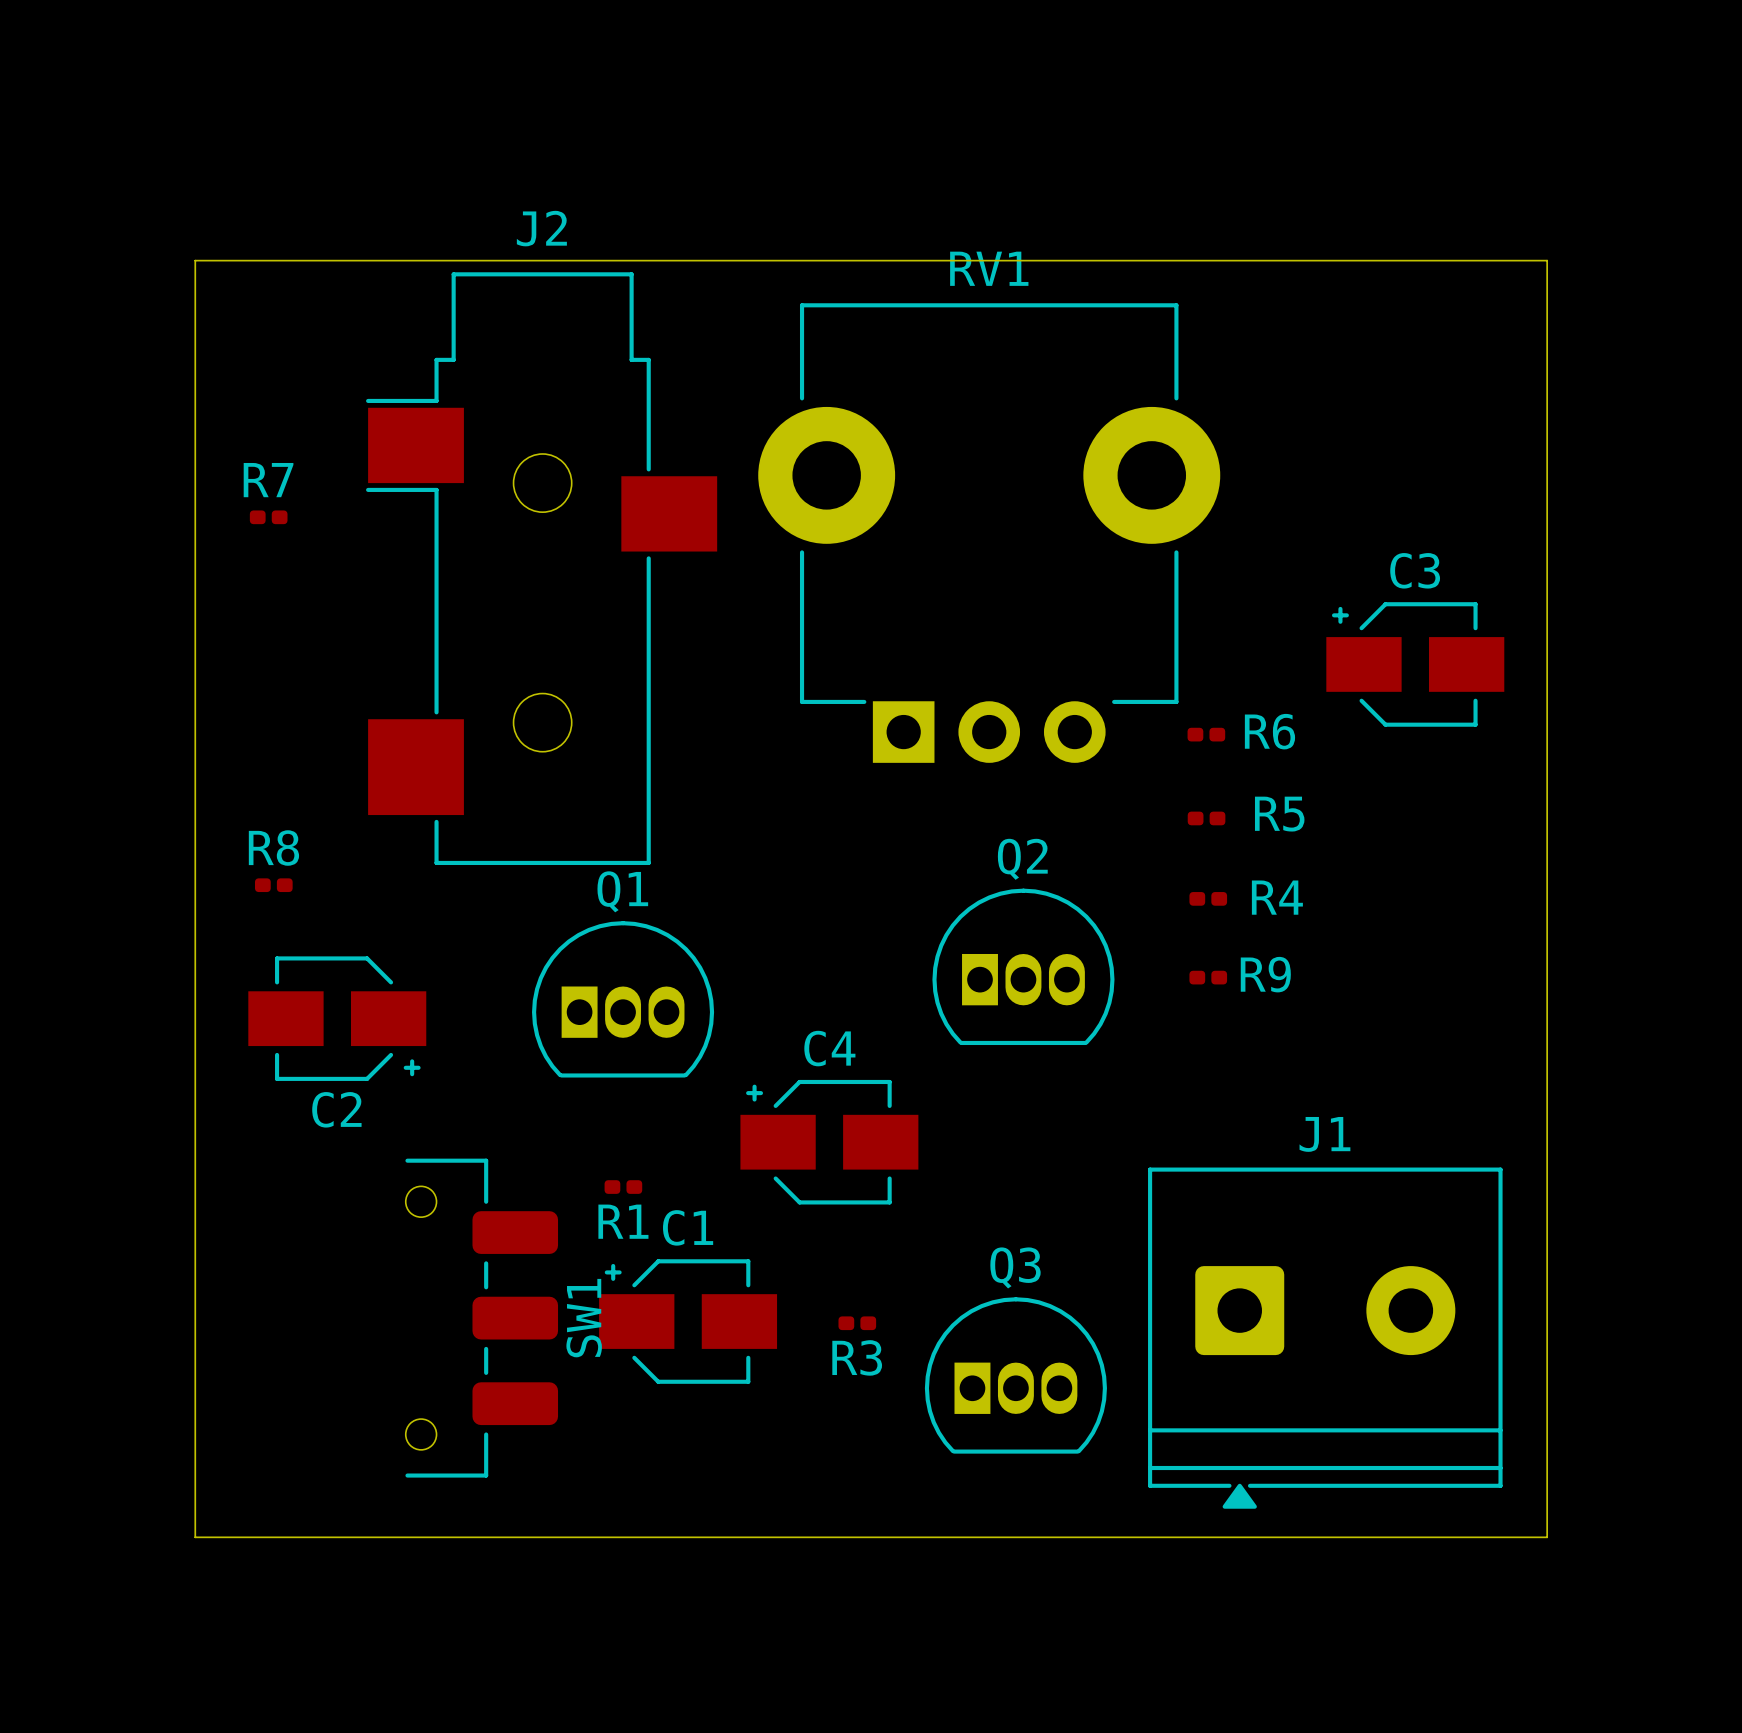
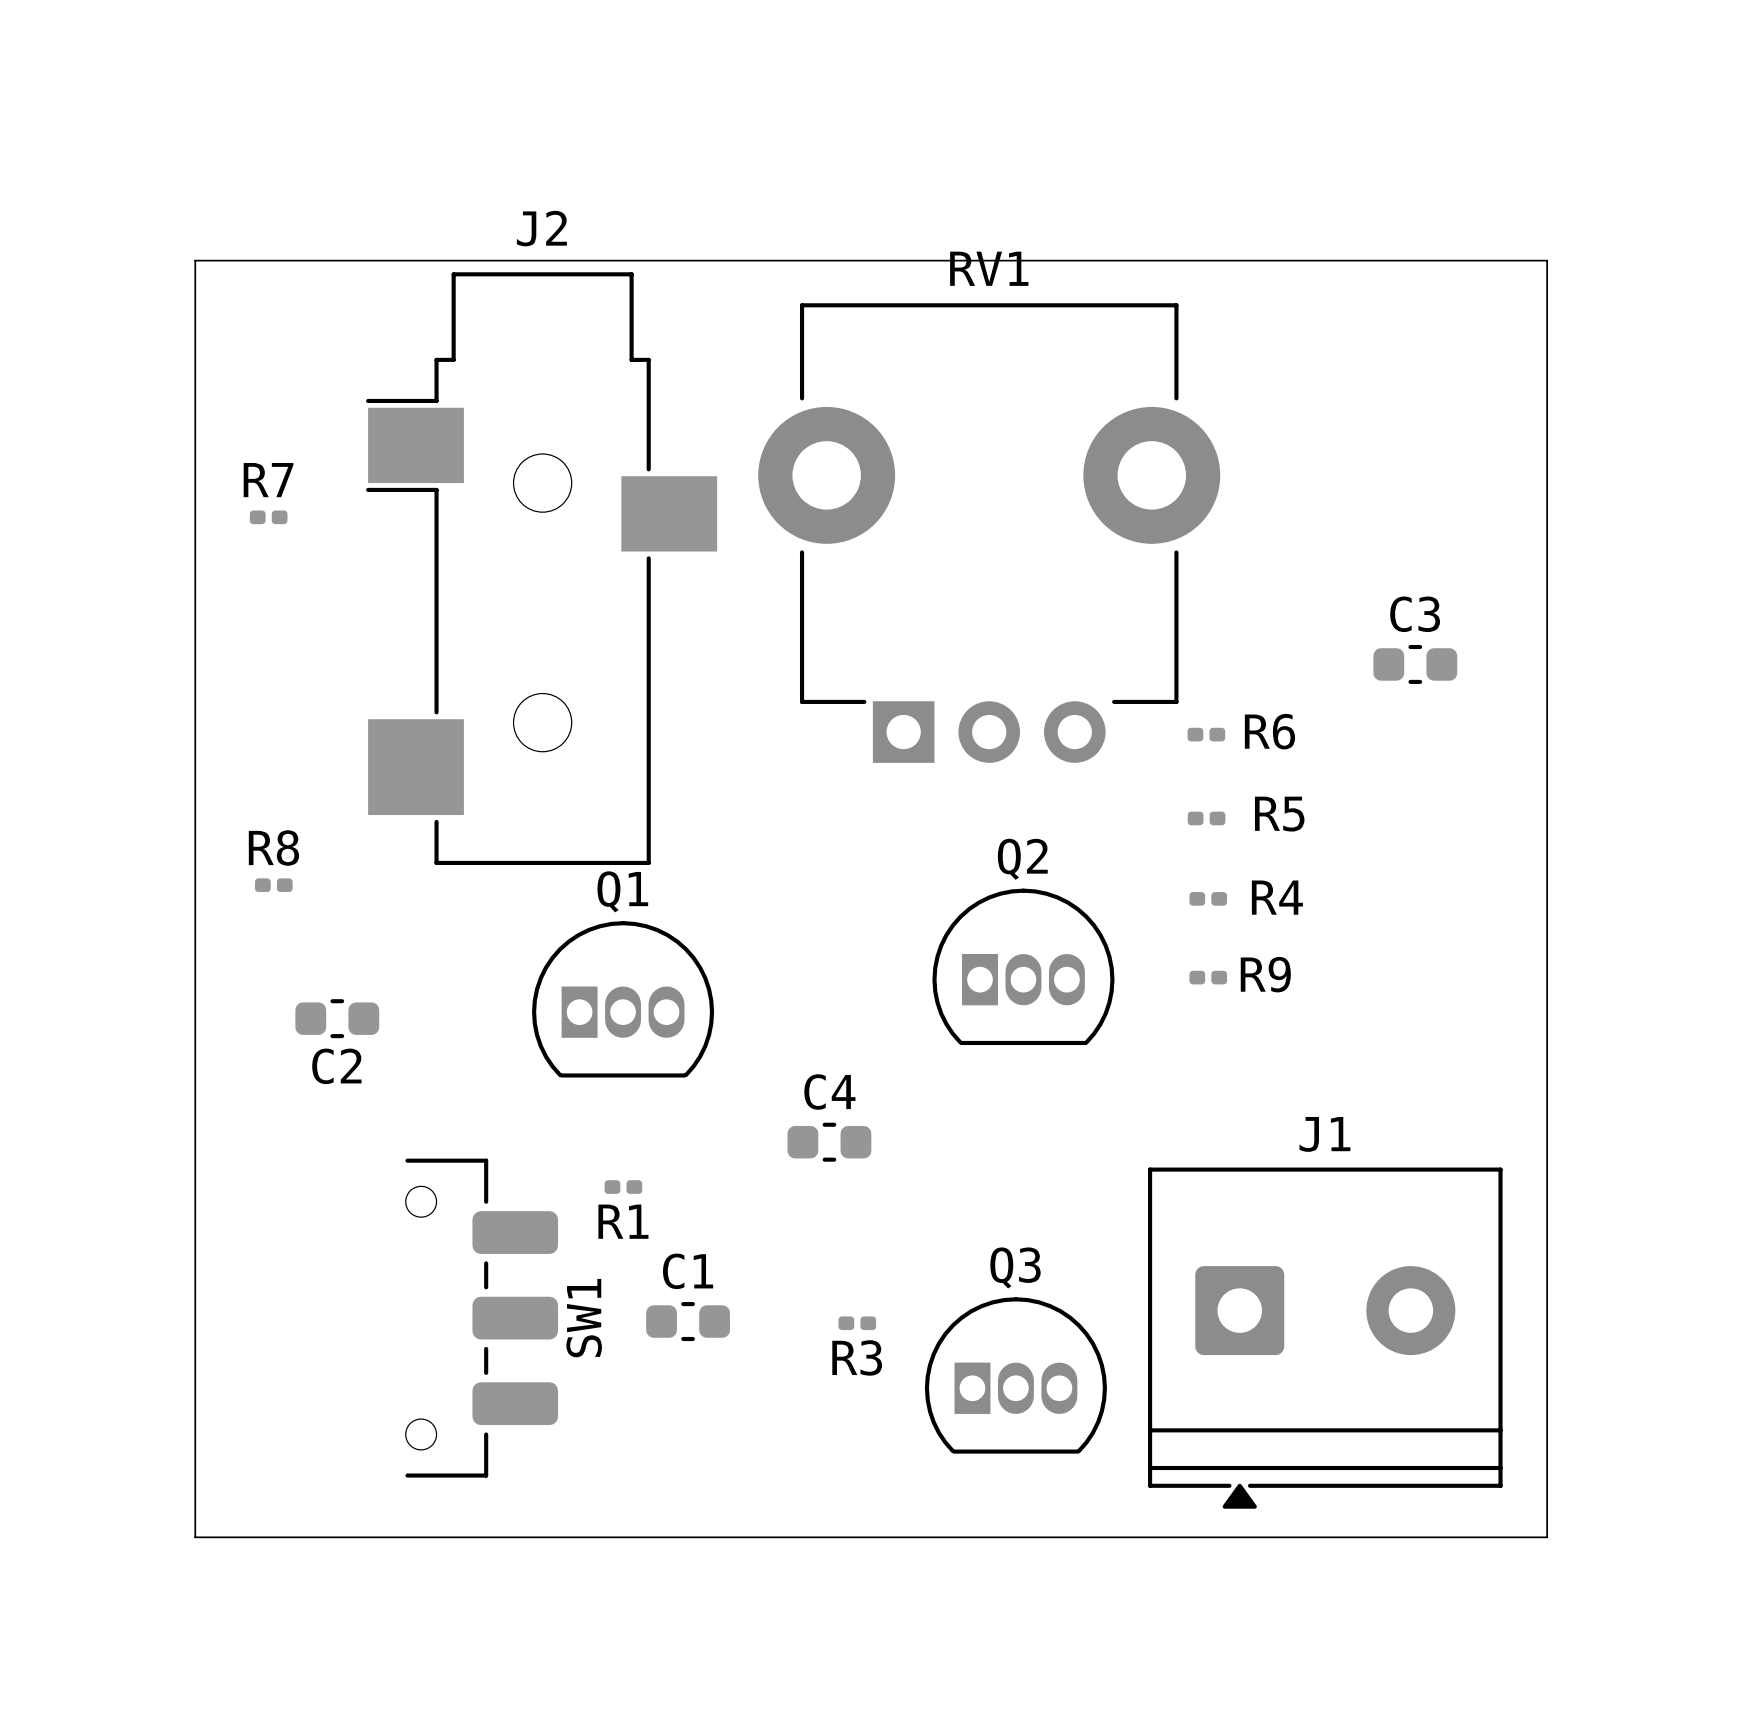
C3 footprint: [1326, 602, 1505, 727] -> [1373, 644, 1458, 684]
C2 footprint: [248, 956, 427, 1081] -> [295, 999, 380, 1039]
C4 footprint: [740, 1079, 919, 1205] -> [787, 1122, 872, 1162]
C1 footprint: [599, 1259, 778, 1384] -> [646, 1302, 731, 1342]

